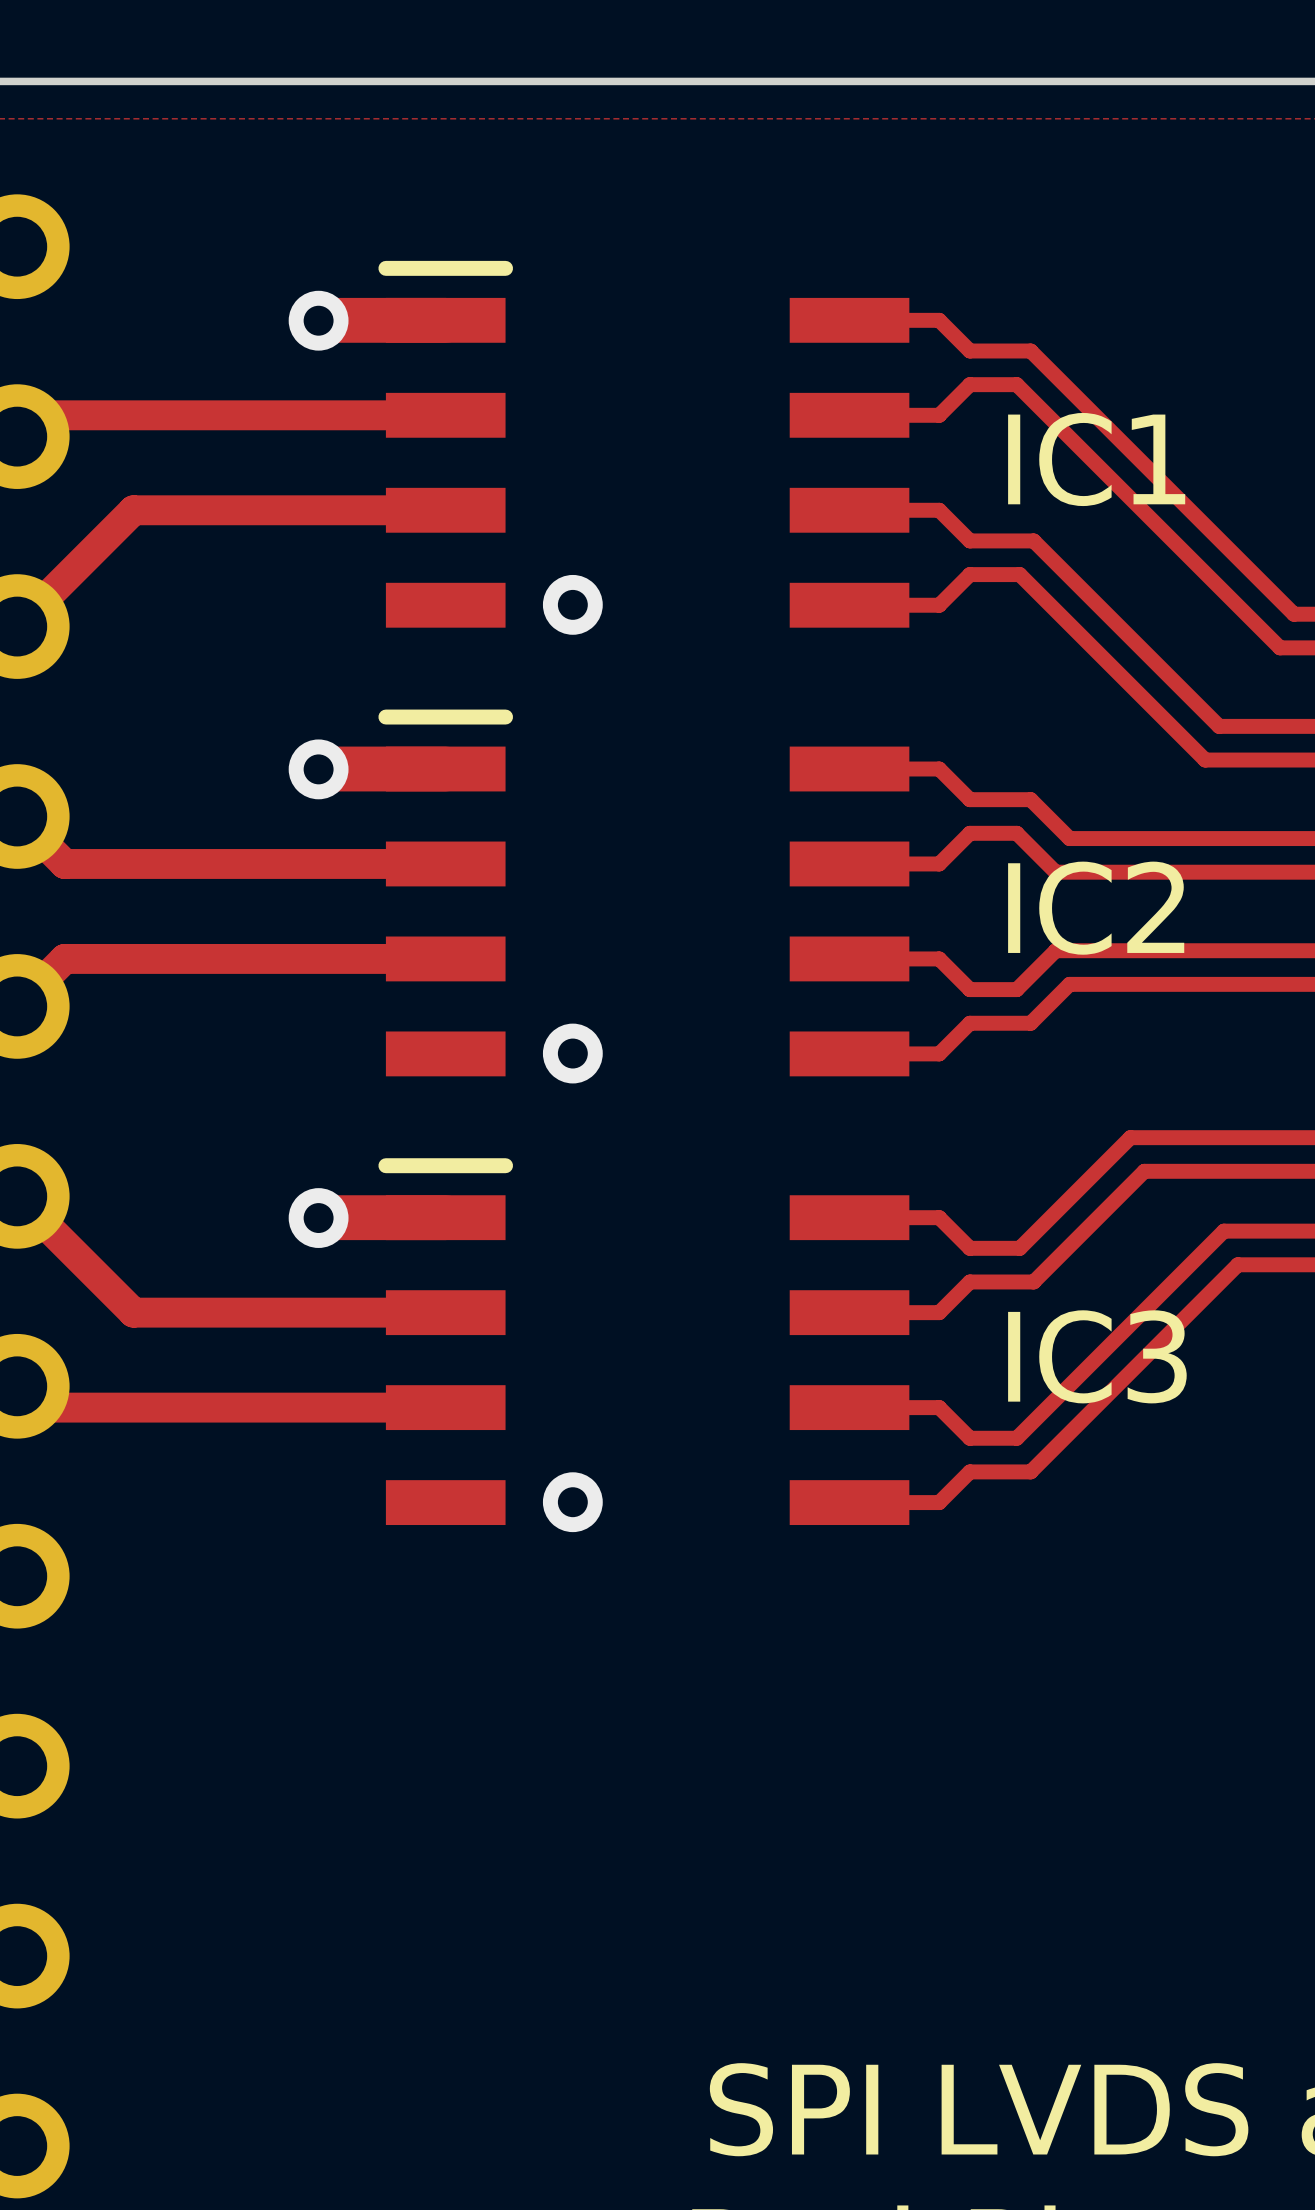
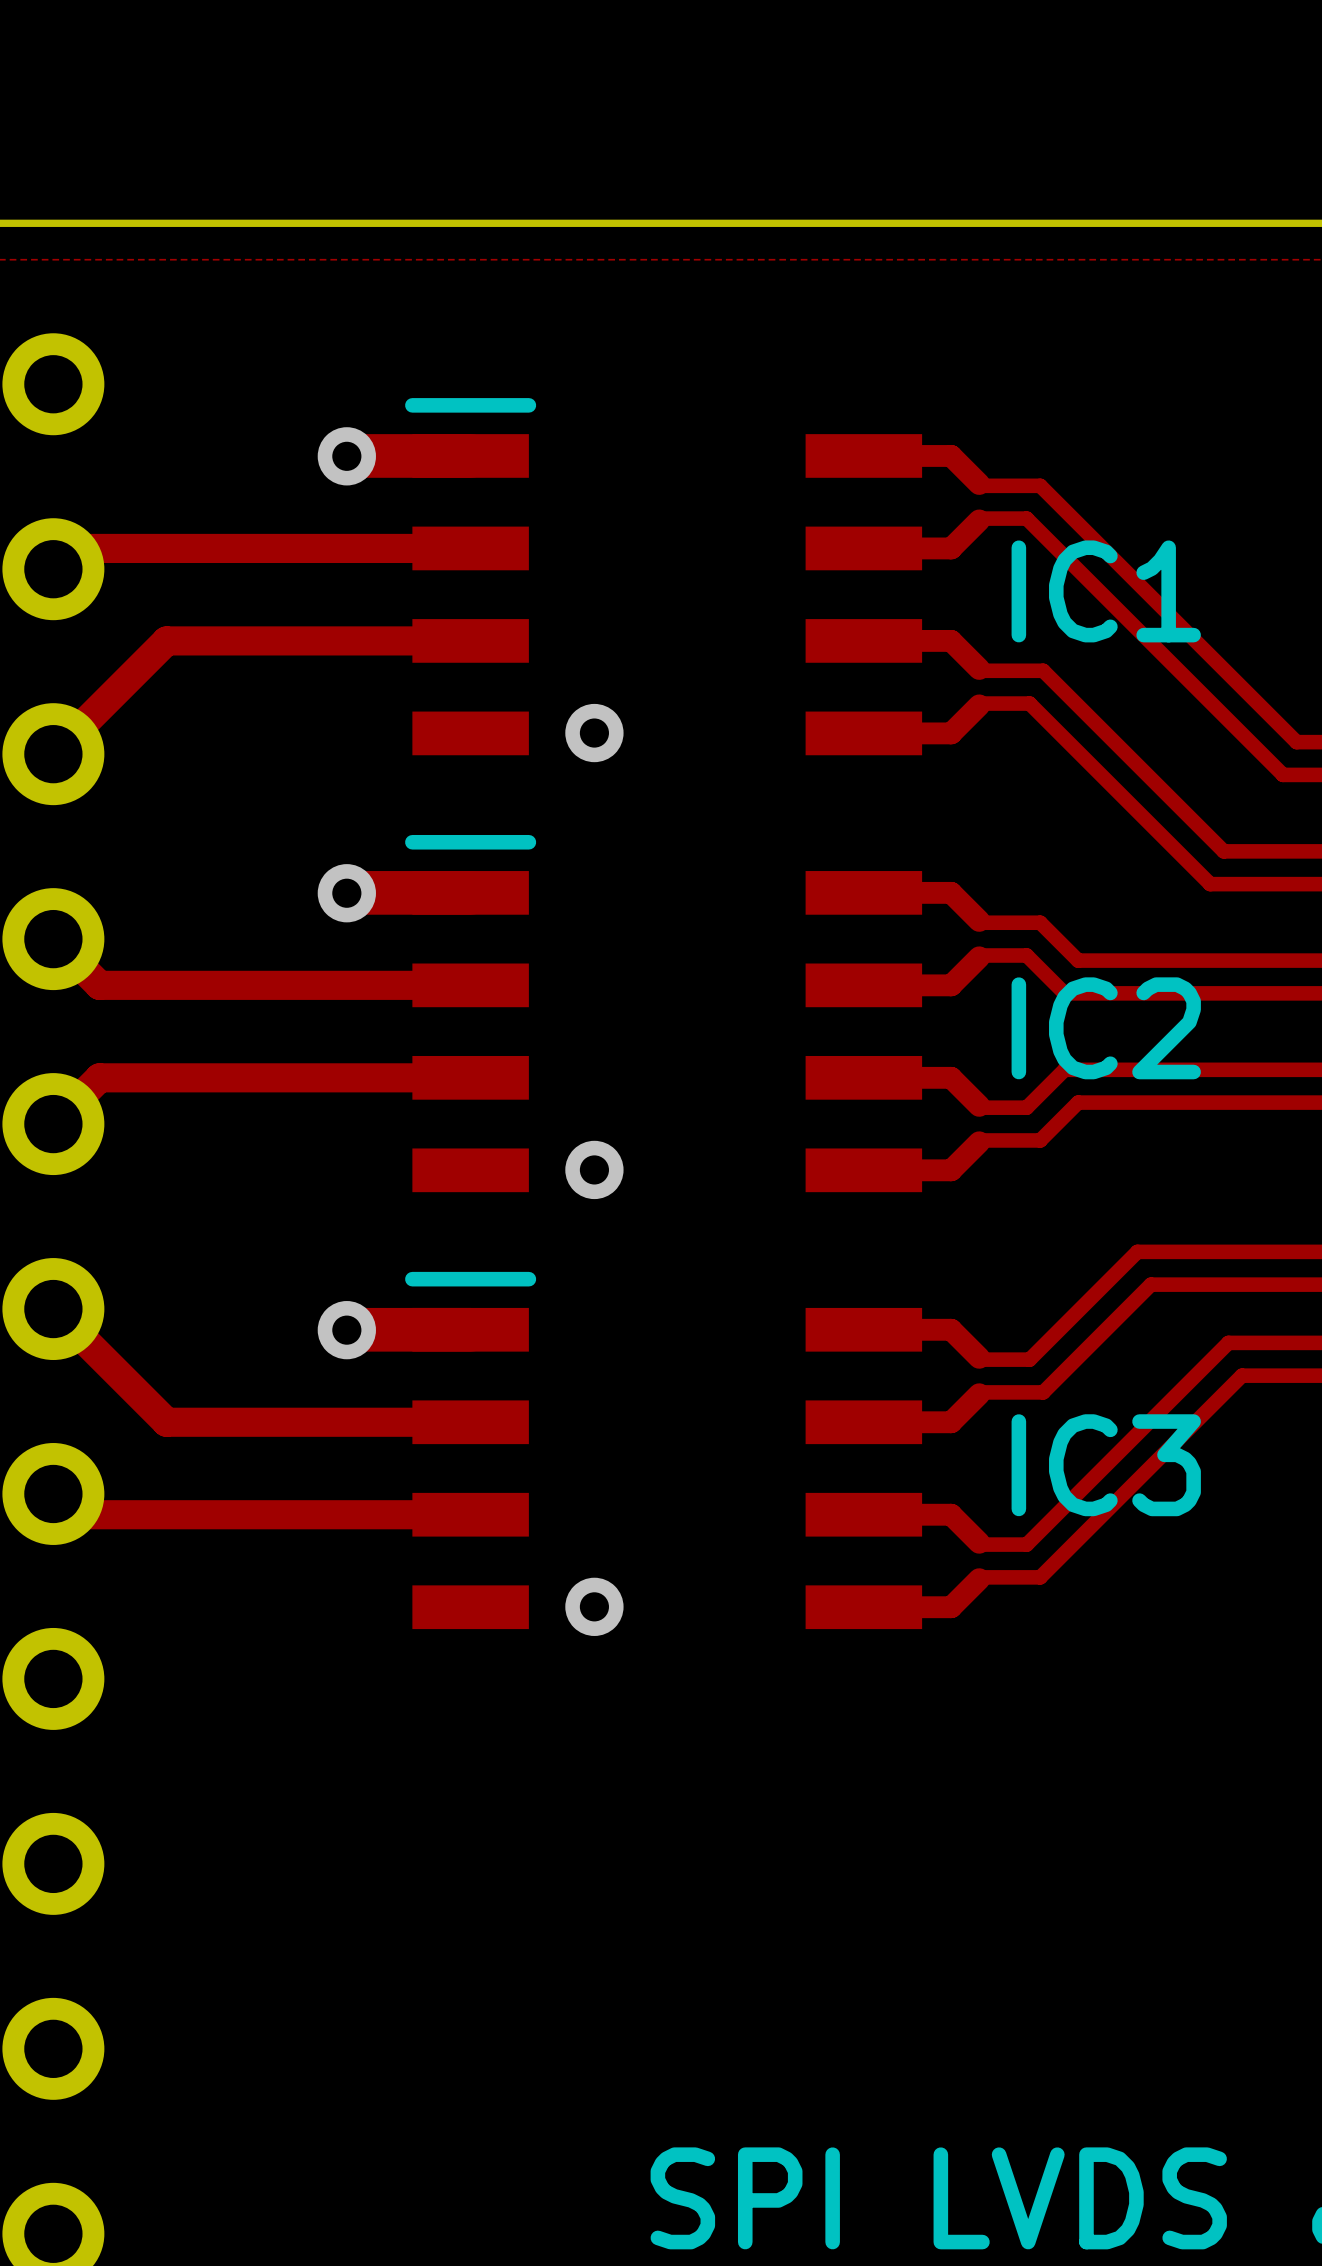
track width: thin (849, 320) (939, 320) (968, 349) -> thick (863, 455) (951, 455) (979, 484)
track width: thin (968, 386) (939, 415) (849, 415) -> thick (979, 520) (951, 548) (863, 548)
track width: thin (849, 510) (939, 510) (968, 539) -> thick (863, 640) (951, 640) (979, 668)
track width: thin (968, 576) (939, 605) (849, 605) -> thick (979, 705) (951, 733) (863, 733)
track width: thin (849, 769) (939, 769) (968, 797) -> thick (863, 892) (951, 892) (979, 920)
track width: thin (968, 835) (939, 863) (849, 863) -> thick (979, 957) (951, 985) (863, 985)
track width: thin (849, 958) (939, 958) (968, 987) -> thick (863, 1077) (951, 1077) (979, 1105)
track width: thin (968, 1025) (939, 1053) (849, 1053) -> thick (979, 1142) (951, 1170) (863, 1170)
track width: thin (849, 1217) (939, 1217) (968, 1246) -> thick (863, 1329) (951, 1329) (979, 1357)
track width: thin (968, 1283) (939, 1312) (849, 1312) -> thick (979, 1394) (951, 1422) (863, 1422)
track width: thin (849, 1407) (939, 1407) (968, 1436) -> thick (863, 1514) (951, 1514) (979, 1542)
track width: thin (968, 1473) (939, 1502) (849, 1502) -> thick (979, 1579) (951, 1607) (863, 1607)

